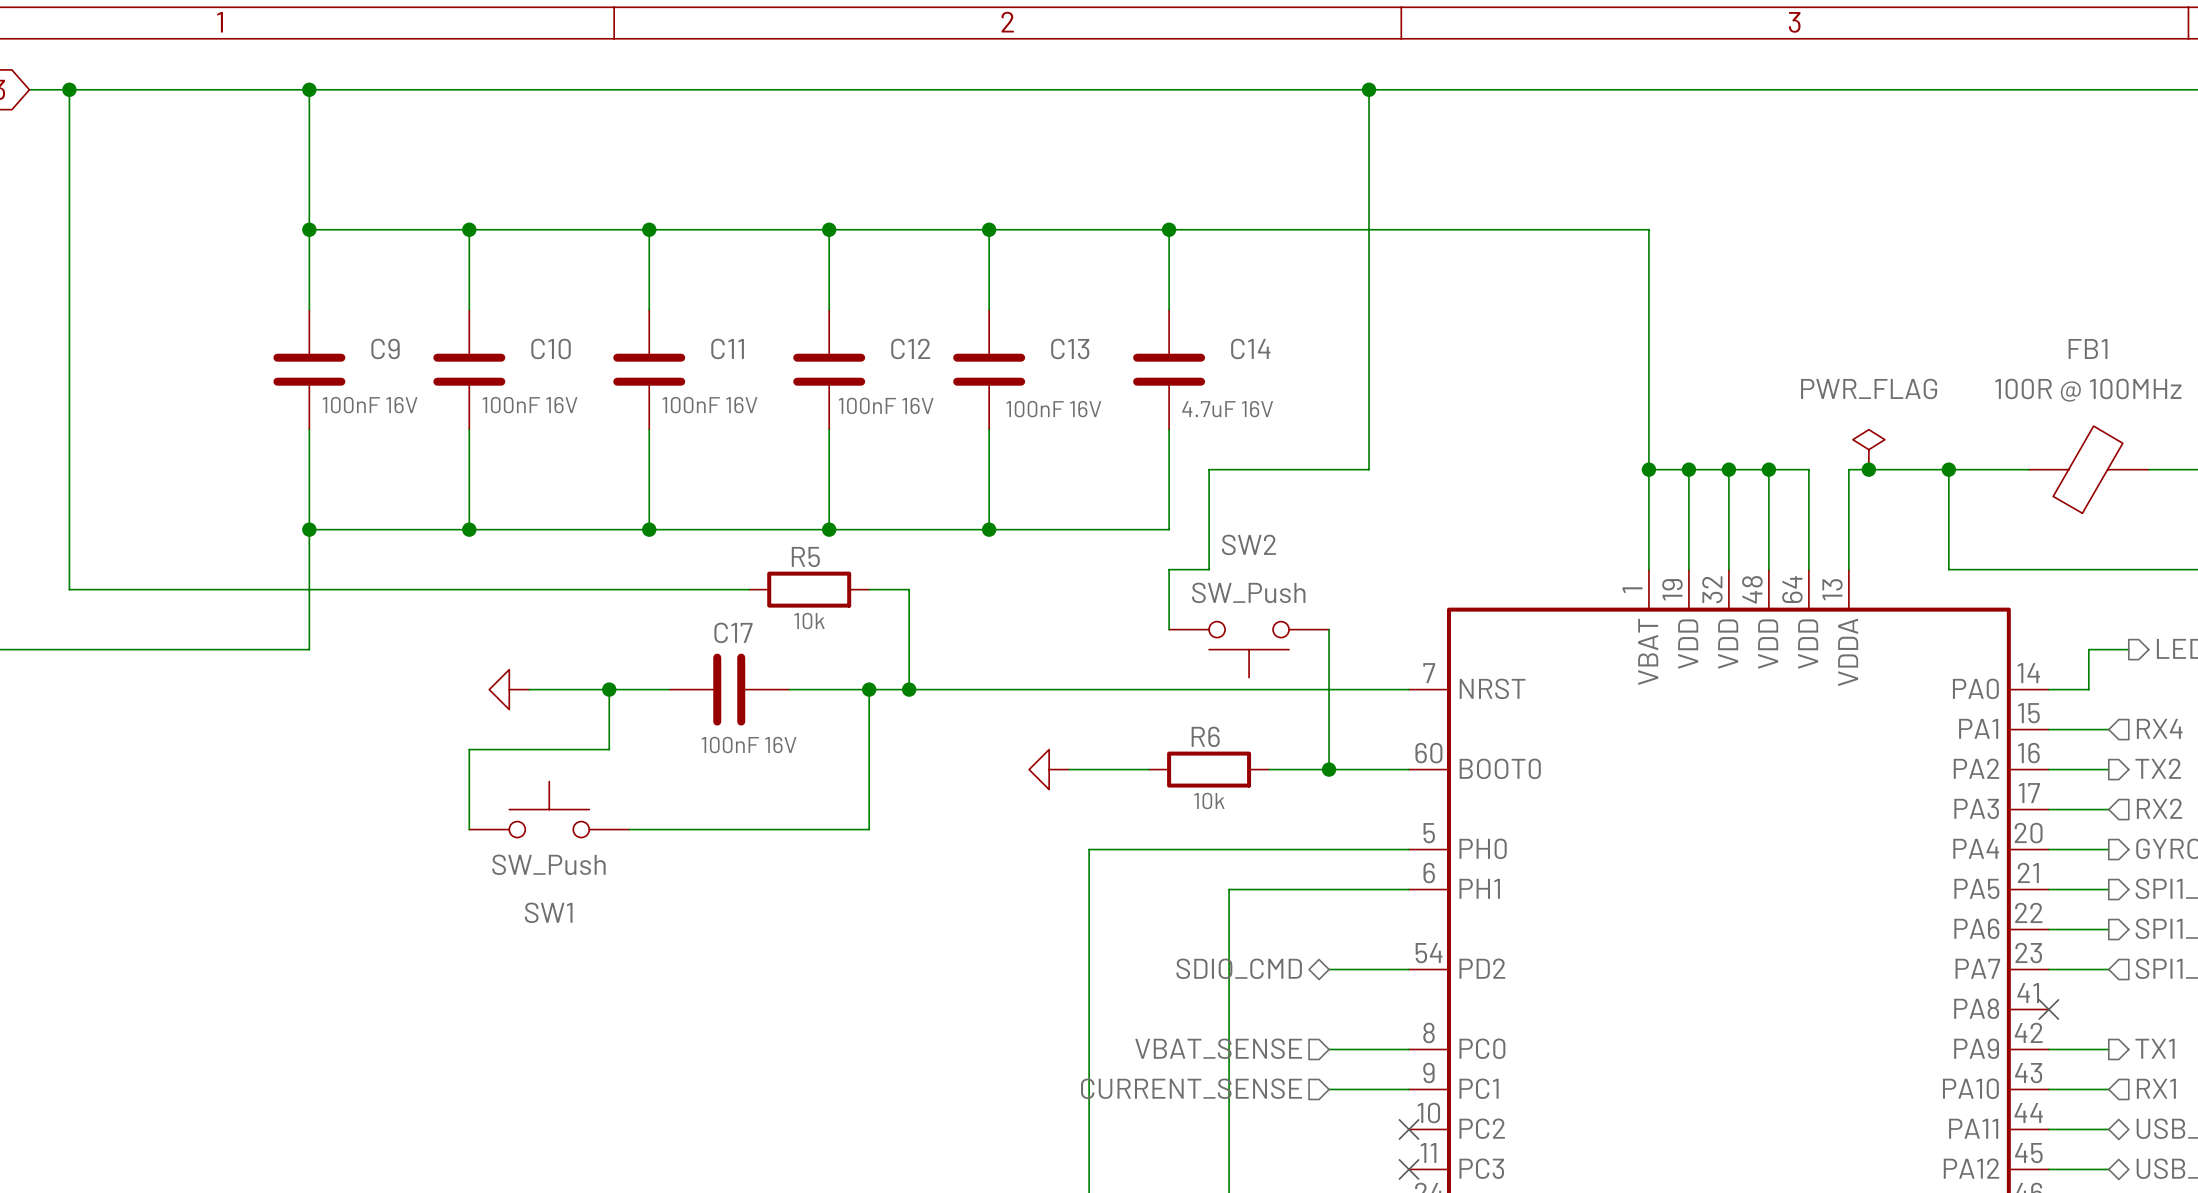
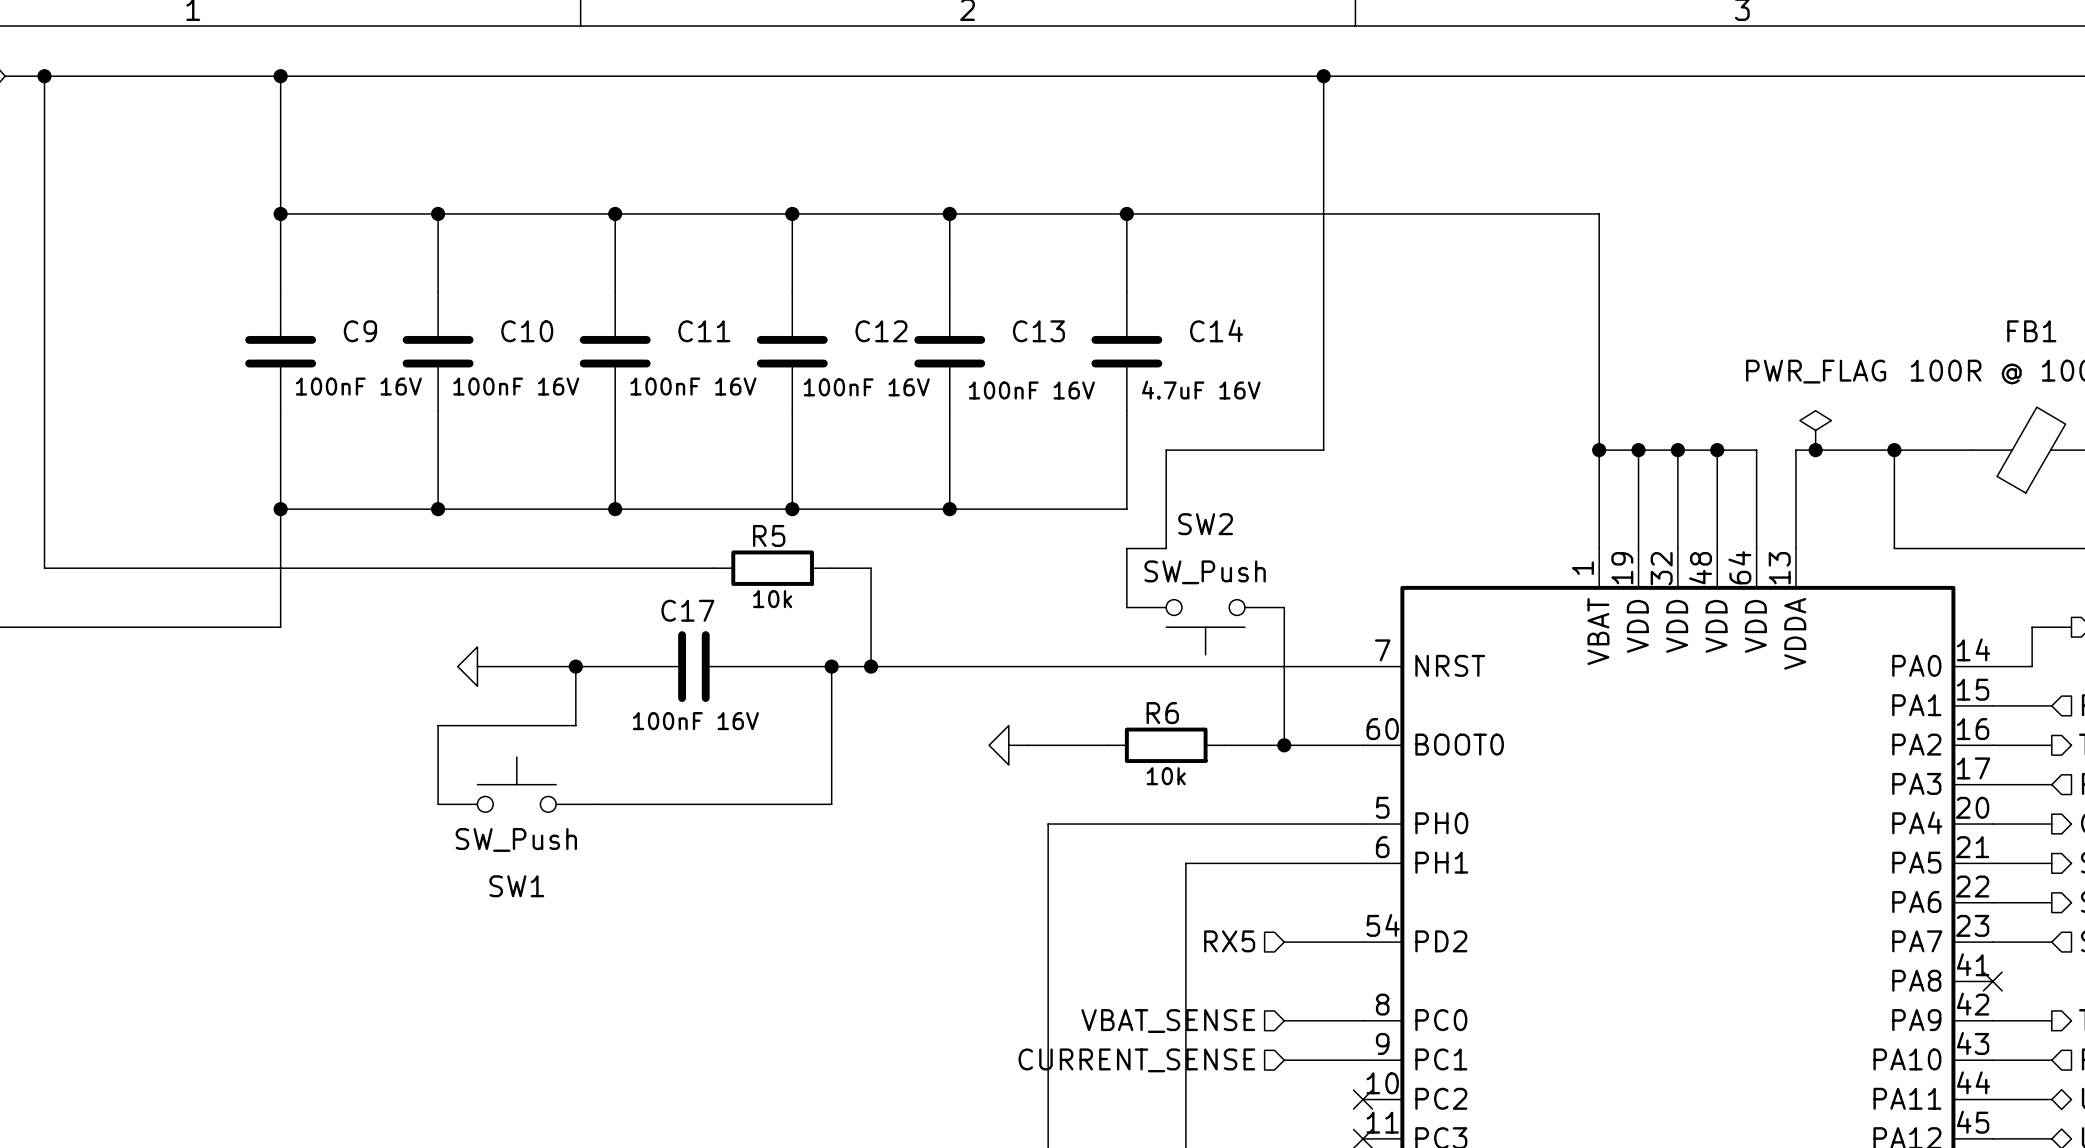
hierarchical label shape: bidirectional (1239, 968) -> input (1229, 941)
hierarchical label: SDIO_CMD (1239, 968) -> RX5 (1229, 941)

